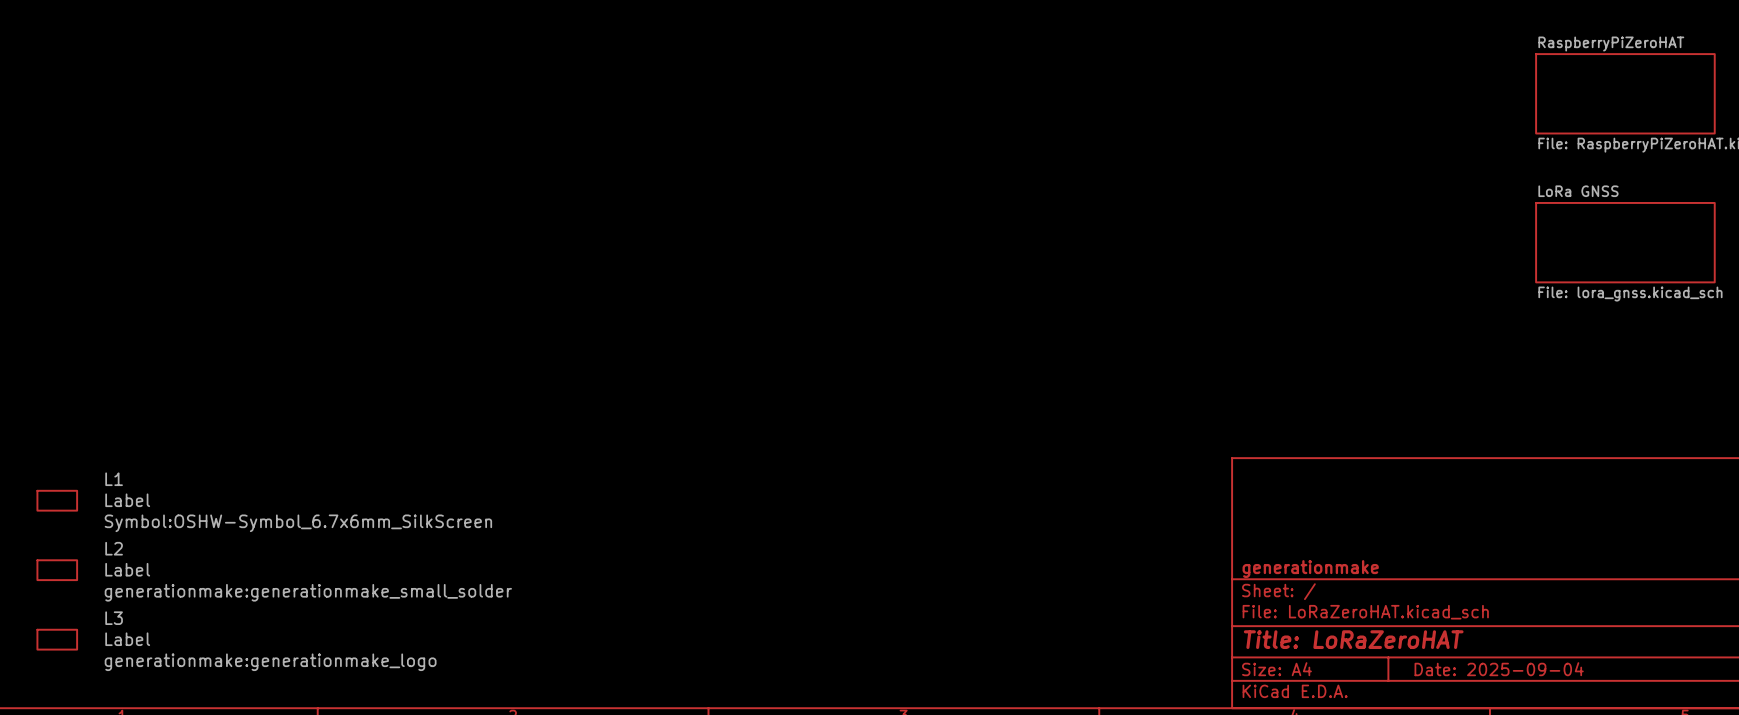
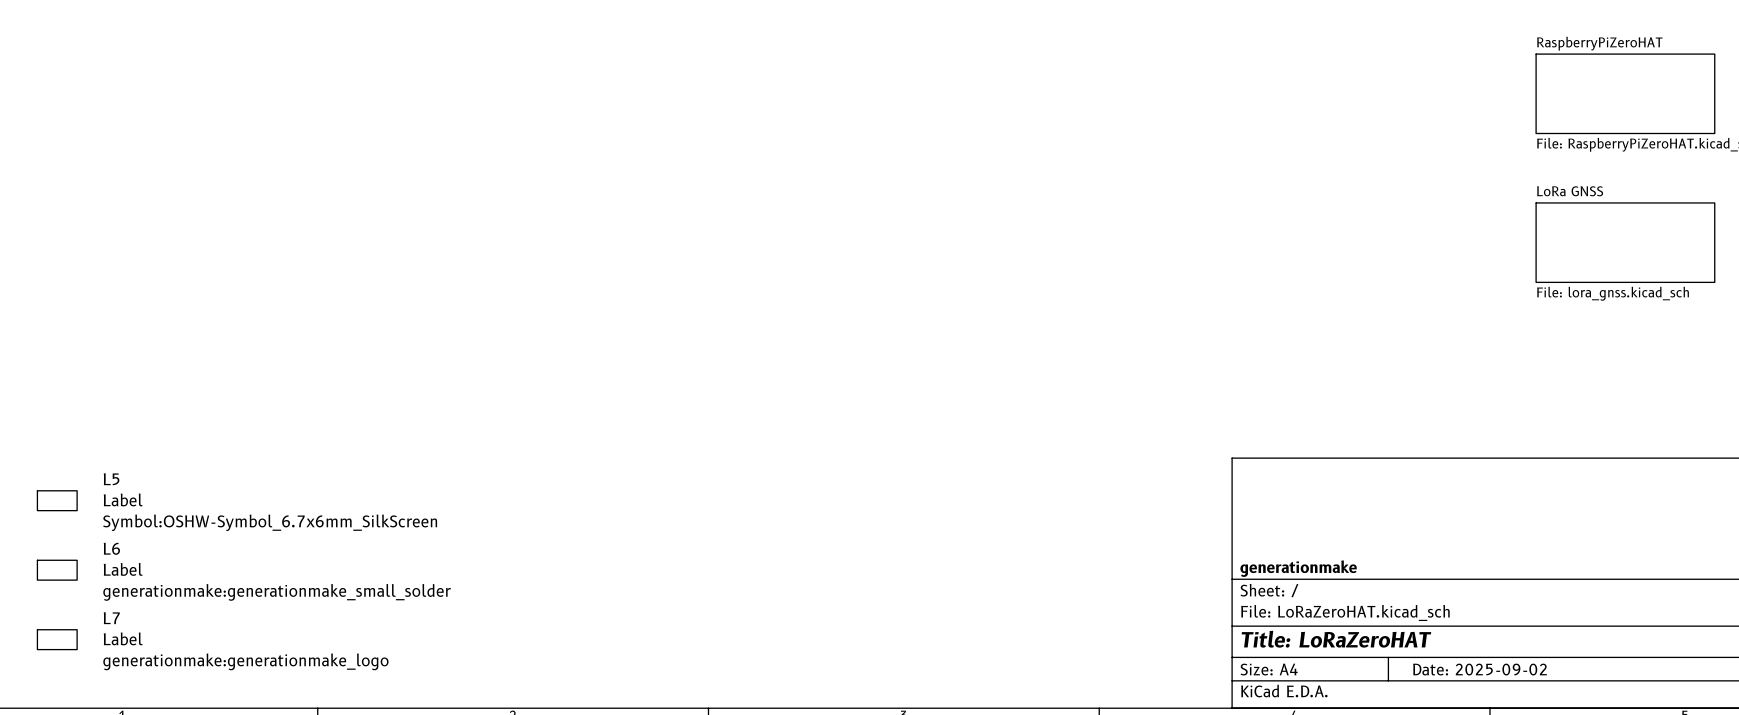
L1 name: L1 (114, 479) -> L5 (111, 479)
L2 name: L2 (114, 548) -> L6 (111, 548)
L3 name: L3 (114, 618) -> L7 (111, 618)
title block: Date: 2025-09-04 (1499, 669) -> Date: 2025-09-02 (1480, 669)

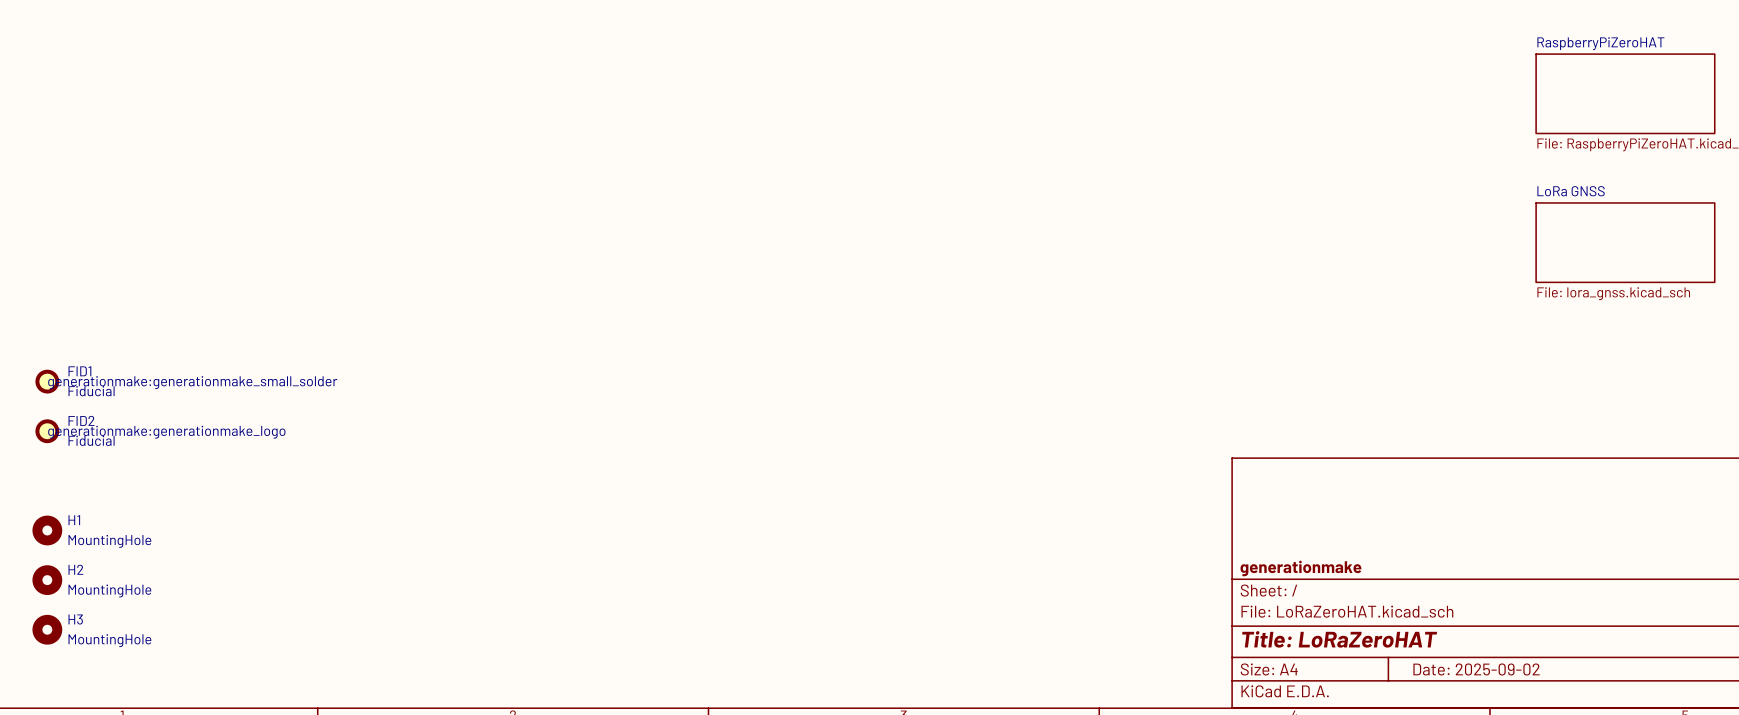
FID1: none -> Fiducial (47, 381)
FID2: none -> Fiducial (47, 431)
L5: Label (57, 500) -> none
H1: none -> MountingHole (47, 530)
L6: Label (57, 570) -> none
H2: none -> MountingHole (47, 580)
H3: none -> MountingHole (47, 629)
L7: Label (57, 639) -> none

